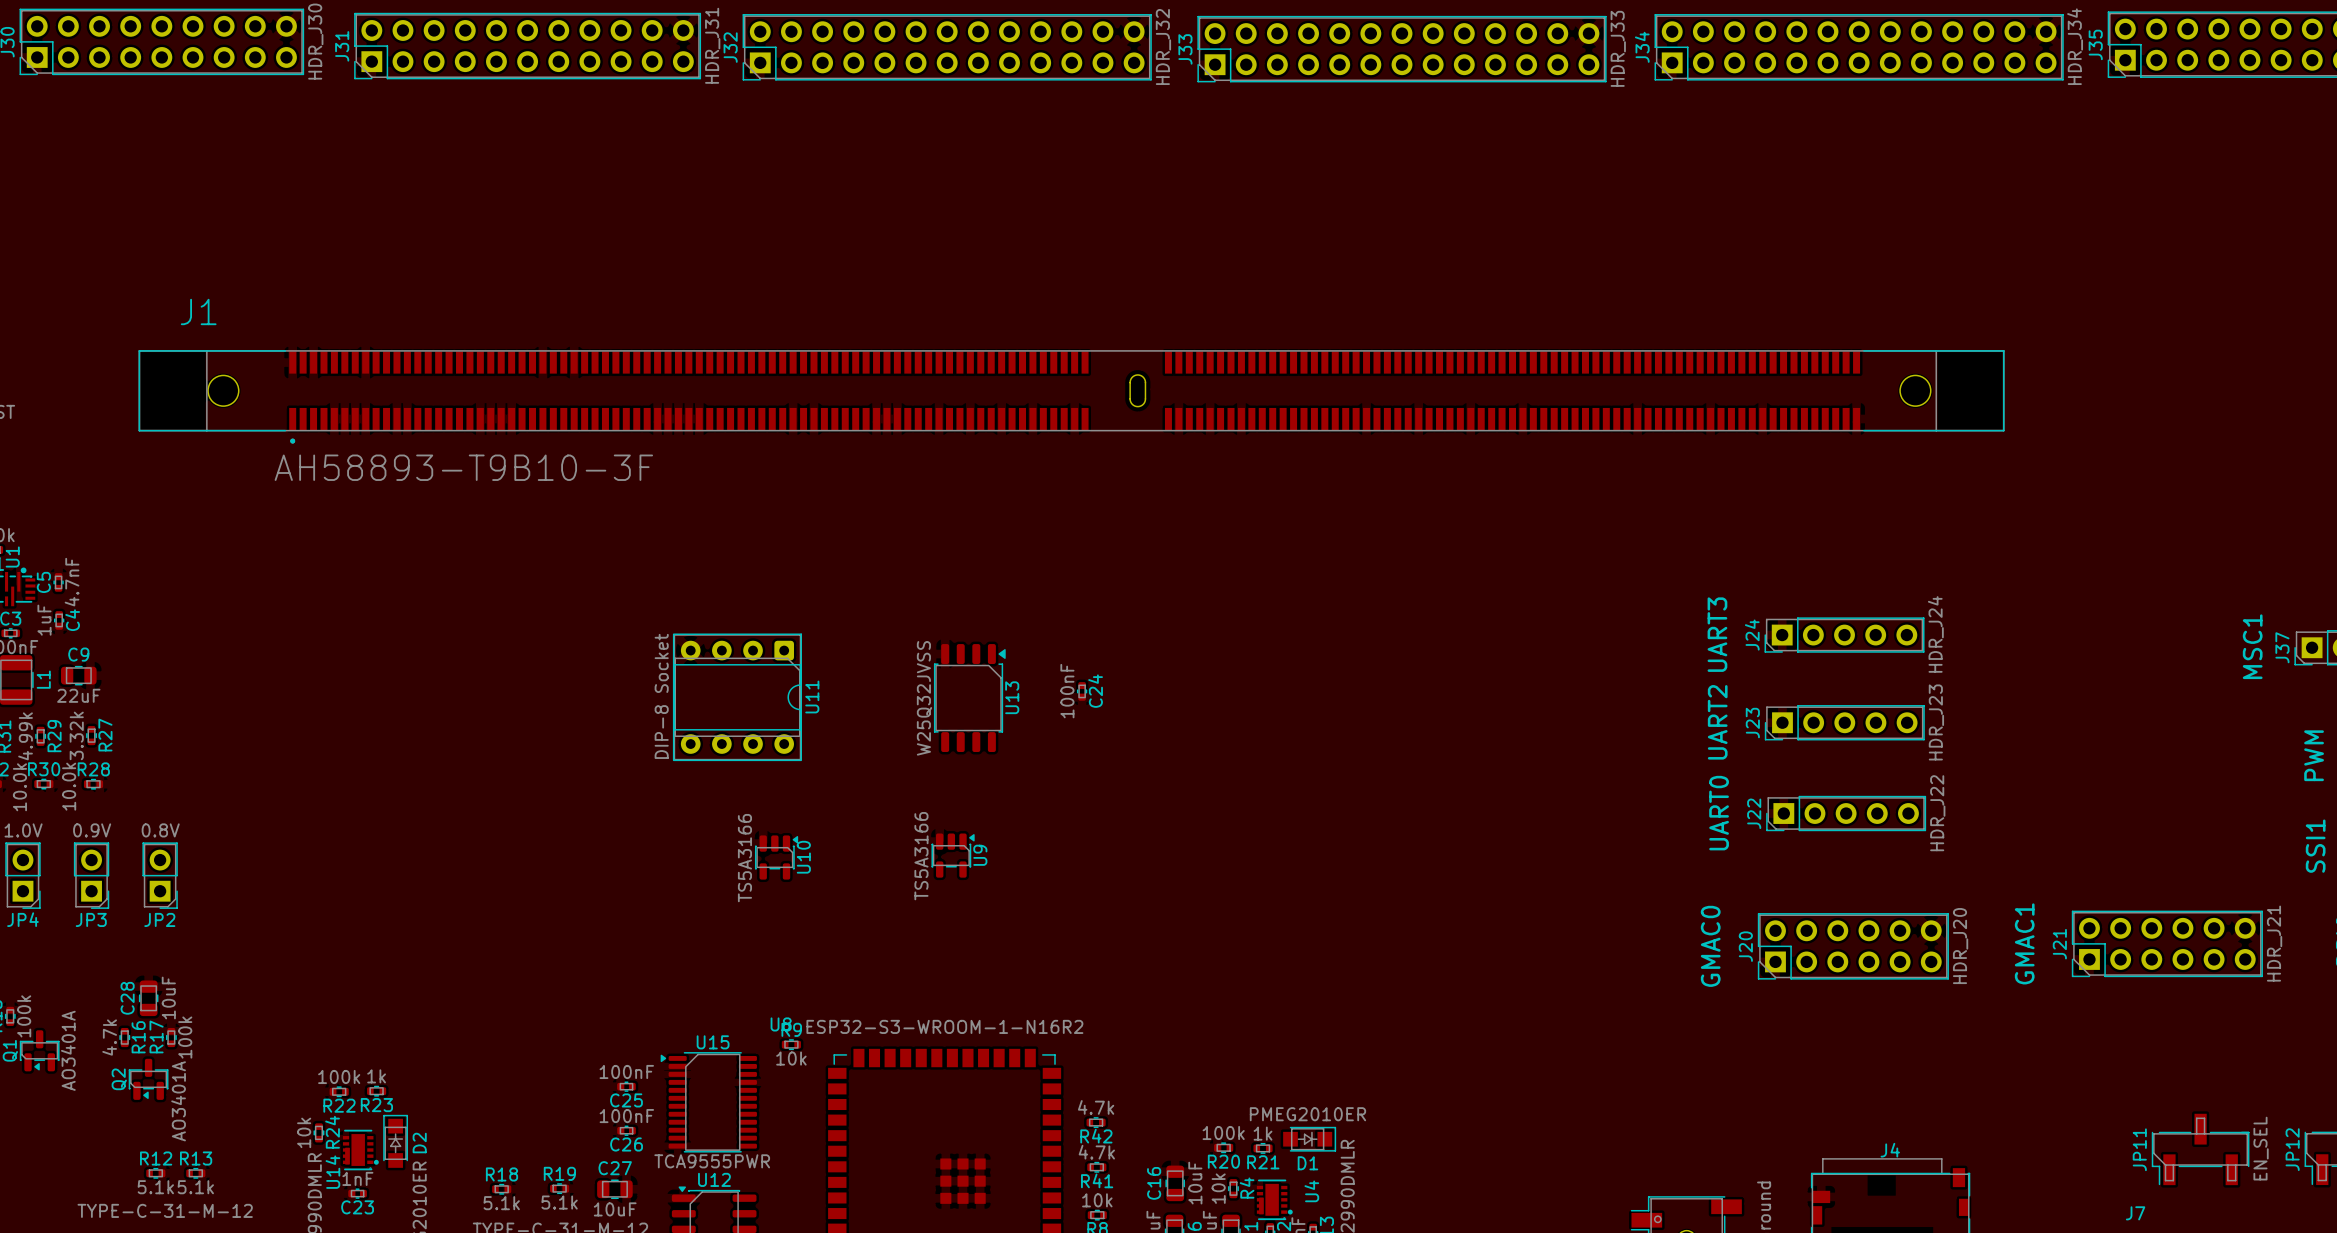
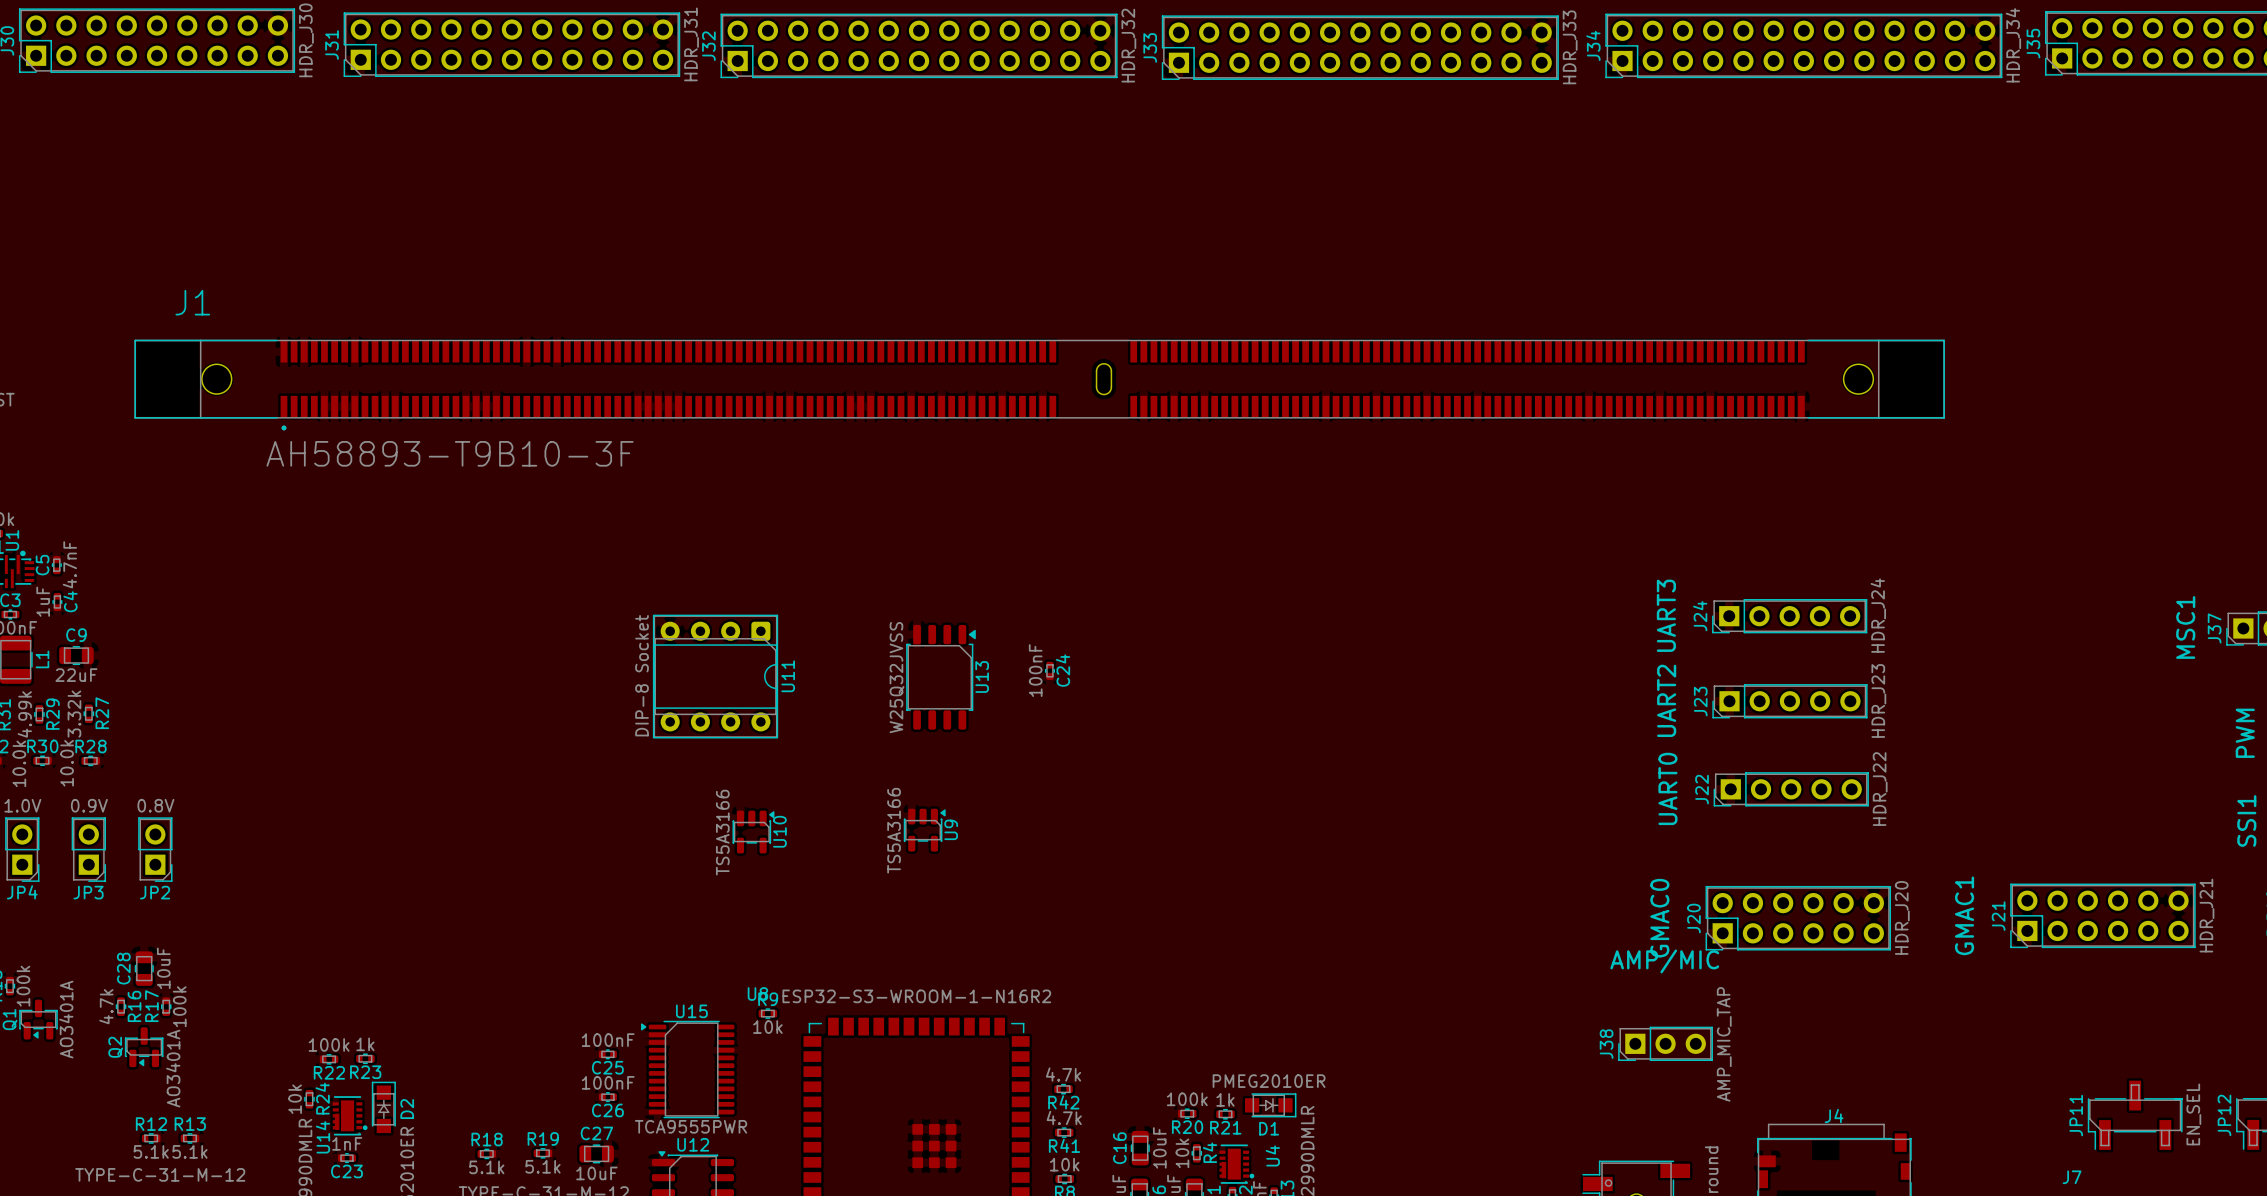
text: none -> AMP/MIC (1664, 961)
J38: none -> AMP_MIC_TAP (1665, 1043)

